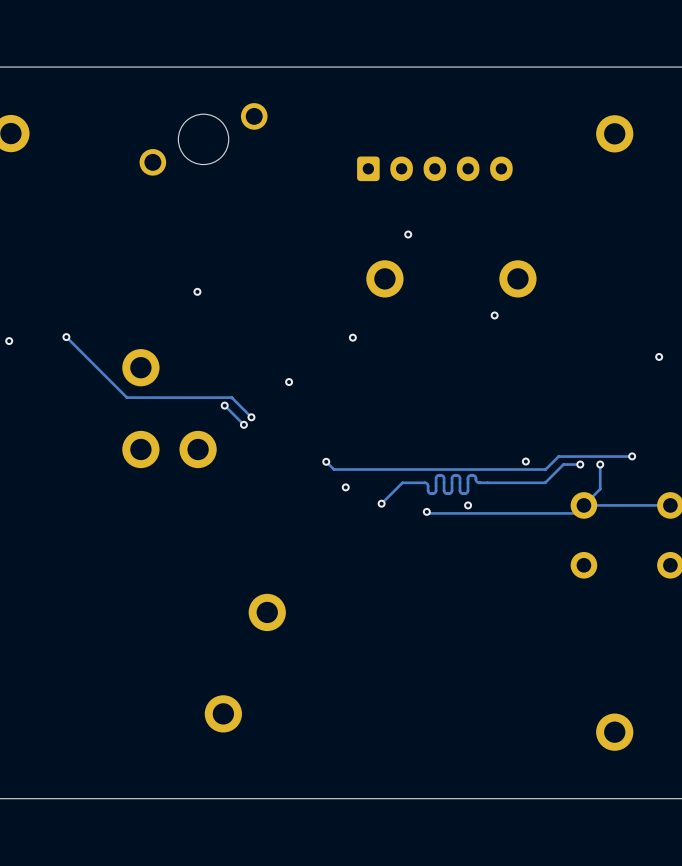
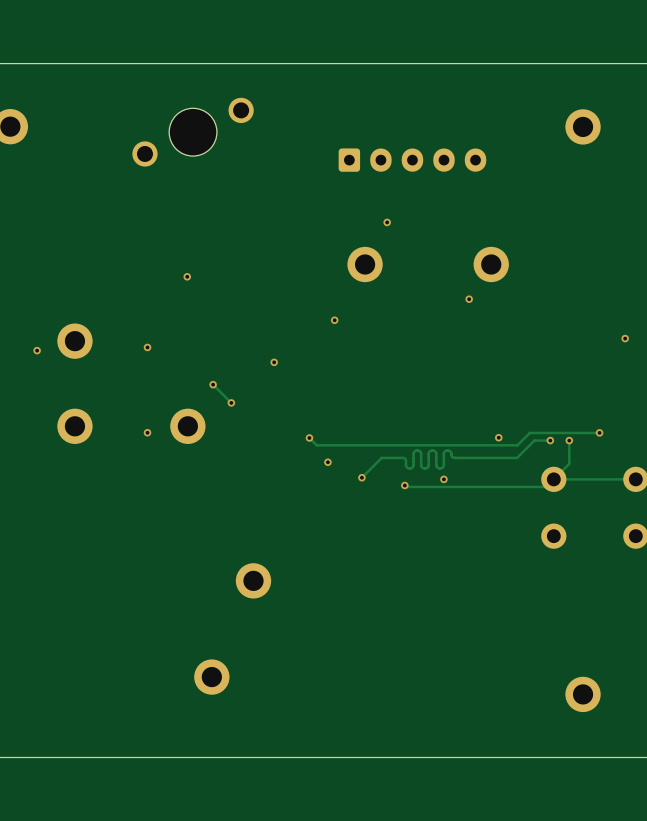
track: (66, 337) (126, 397) (231, 397) (251, 417) -> none
via: (66, 337) -> none
via: (9, 341) -> none
part: none -> (74, 341)
via: none -> (147, 347)
part: (140, 367) -> none
via: none -> (37, 350)
via: (251, 417) -> none
part: none -> (74, 426)
part: (140, 449) -> none
via: none -> (147, 432)

